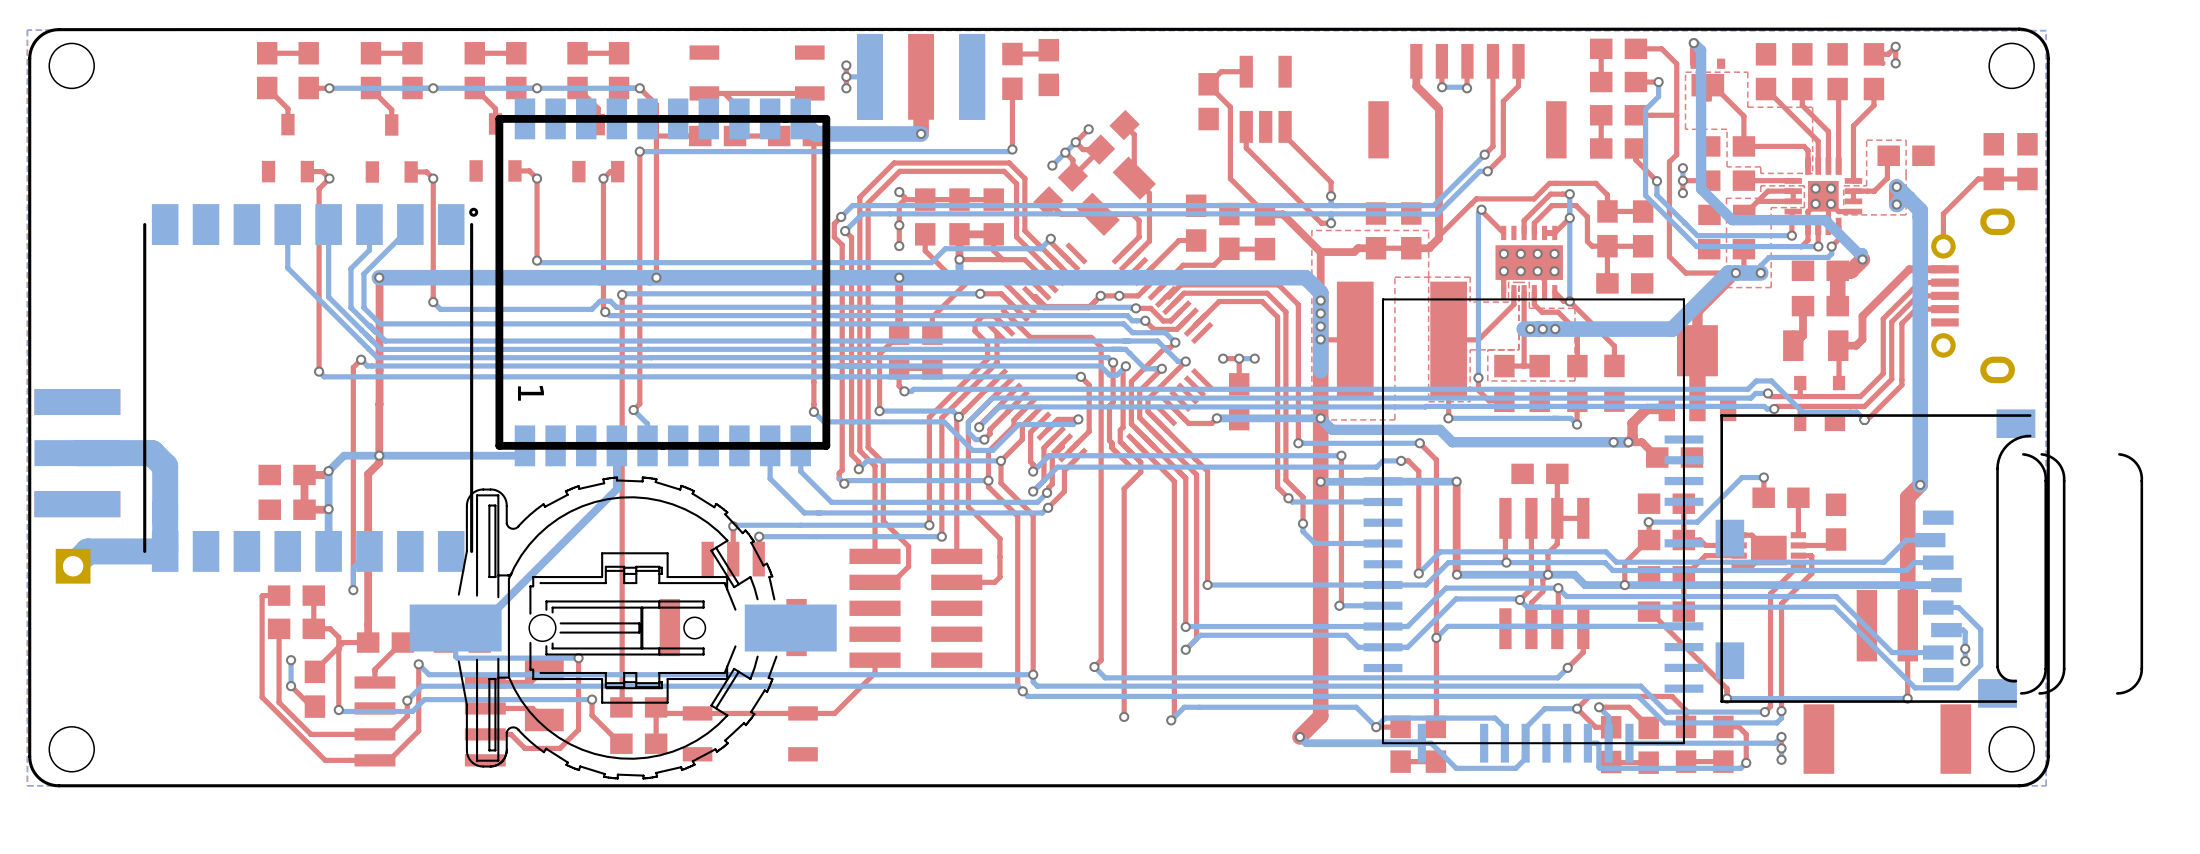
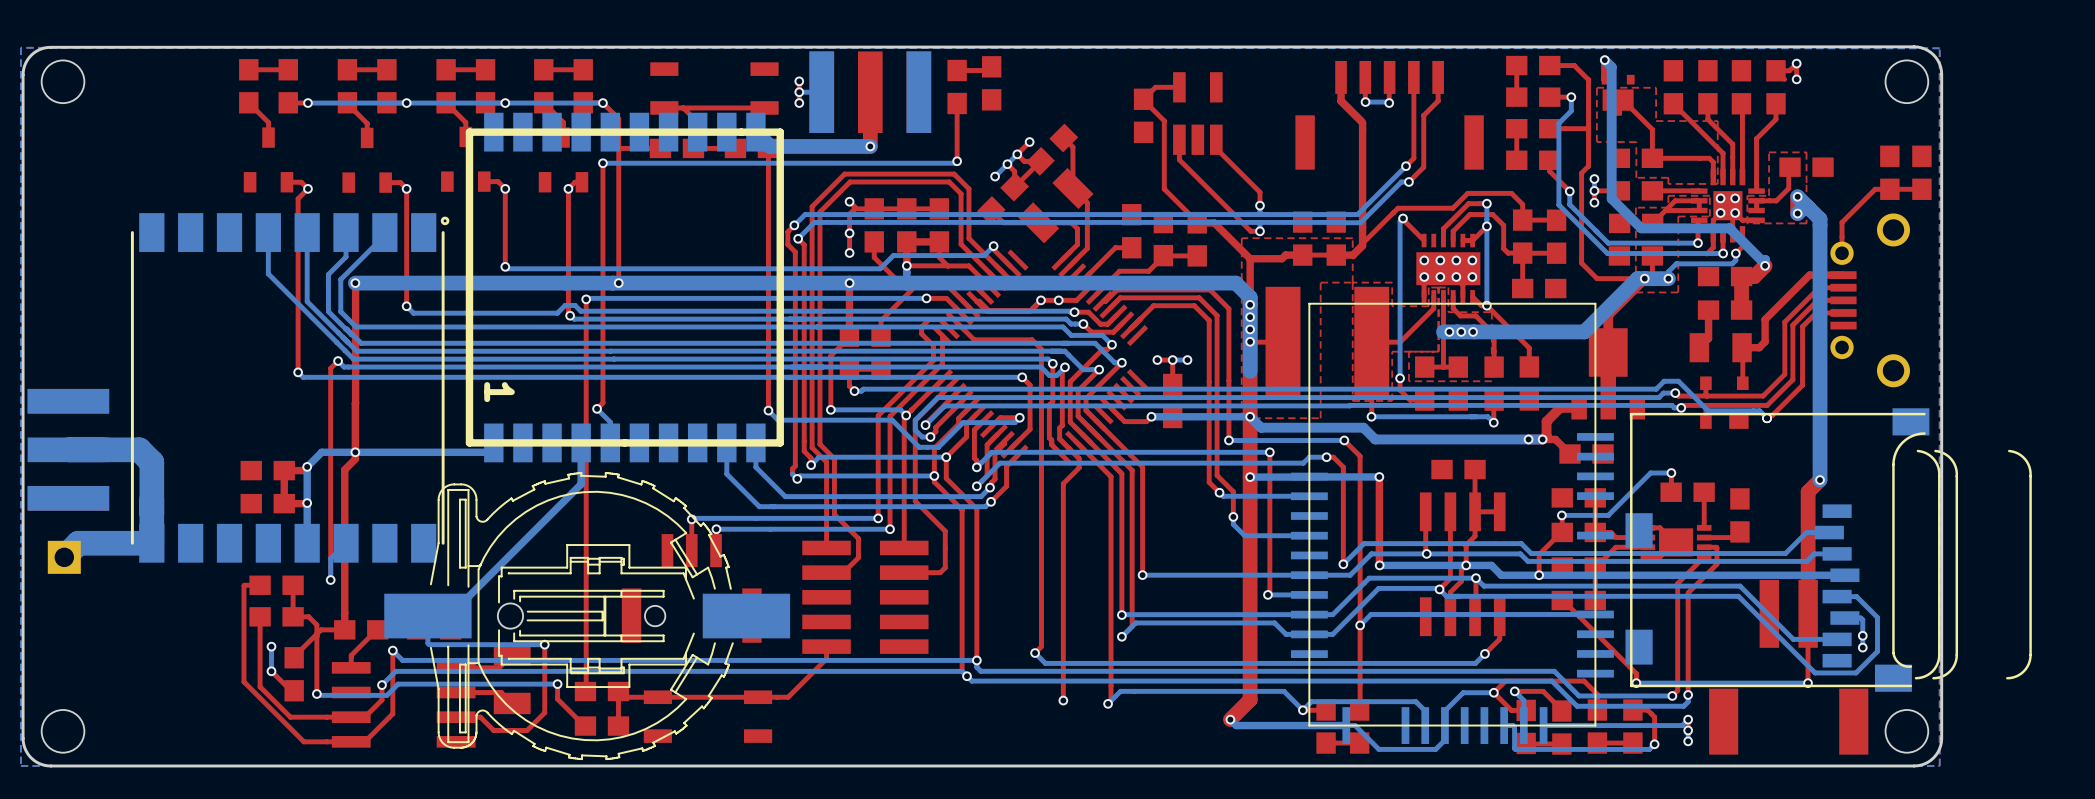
part footprint: [1931, 208, 2015, 384] -> [1830, 213, 1911, 388]

